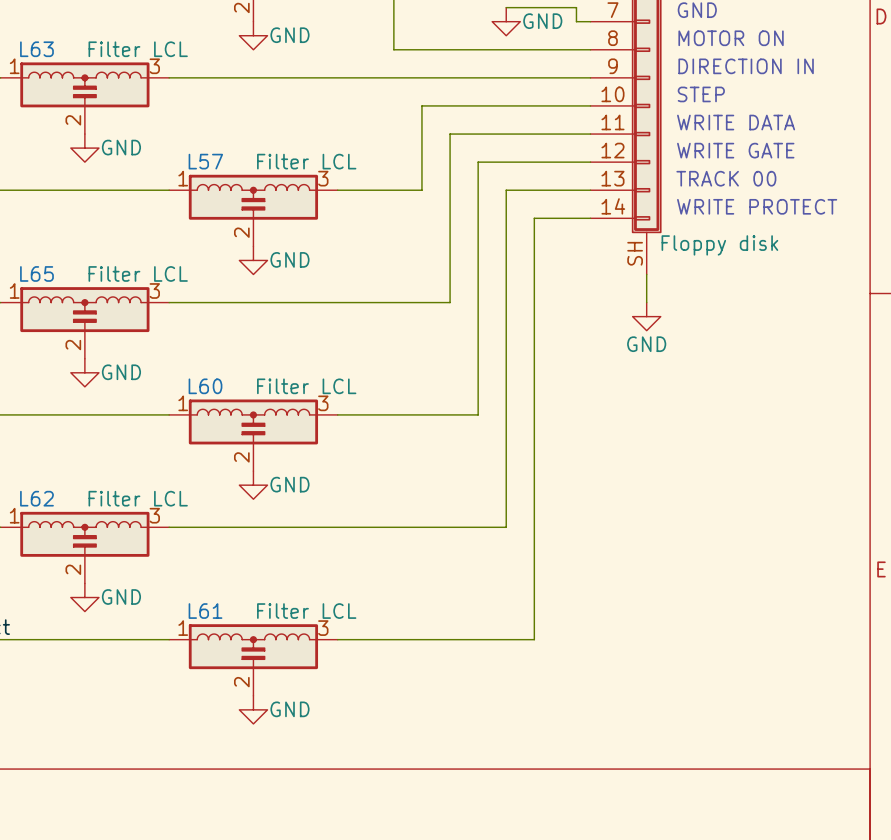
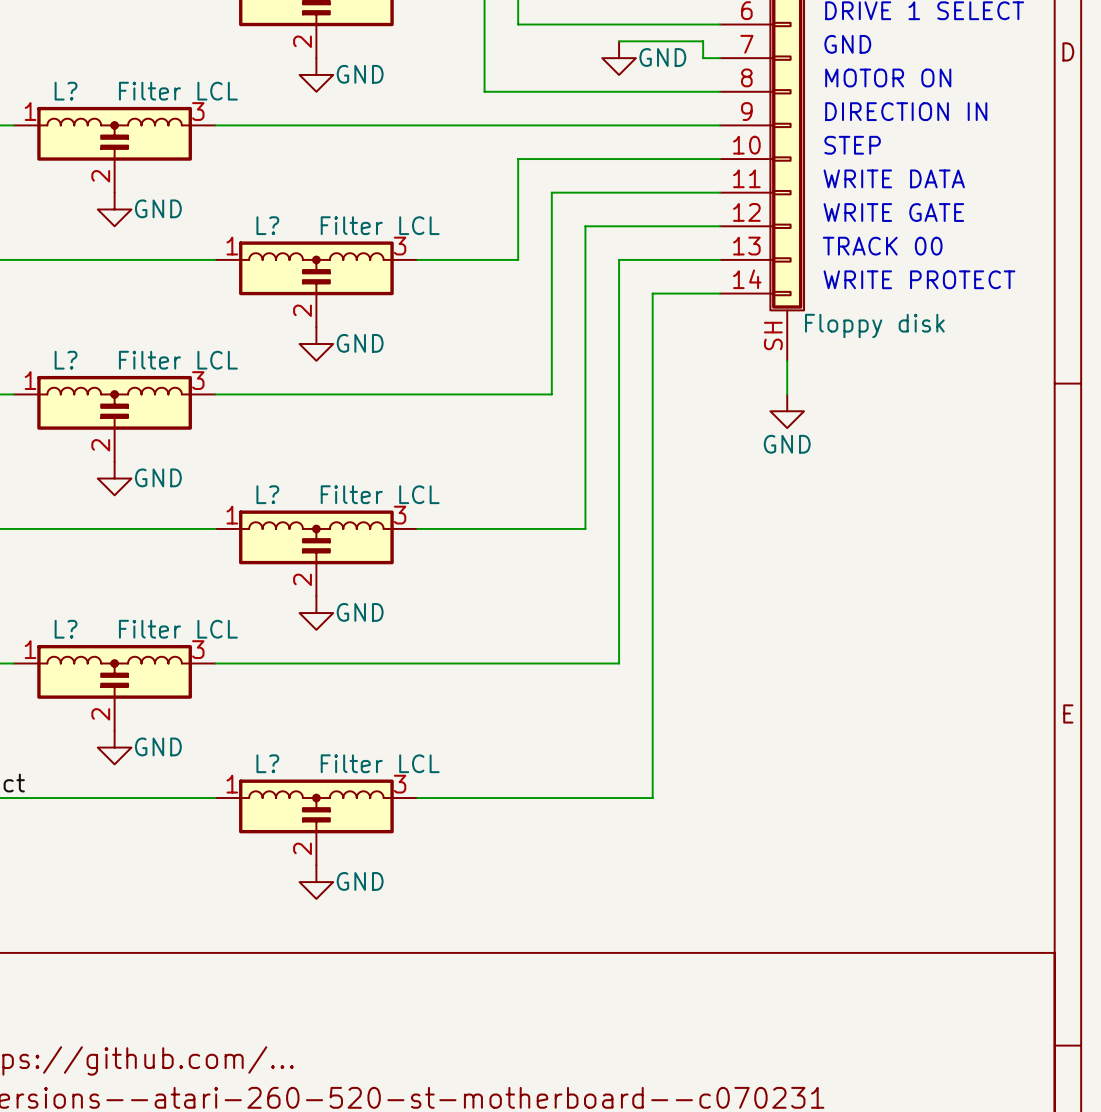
L63 name: L63 (36, 49) -> L? (66, 91)
L57 name: L57 (205, 161) -> L? (267, 225)
L65 name: L65 (36, 273) -> L? (66, 360)
L60 name: L60 (205, 386) -> L? (267, 494)
L62 name: L62 (36, 498) -> L? (66, 629)
L61 name: L61 (205, 611) -> L? (267, 763)

